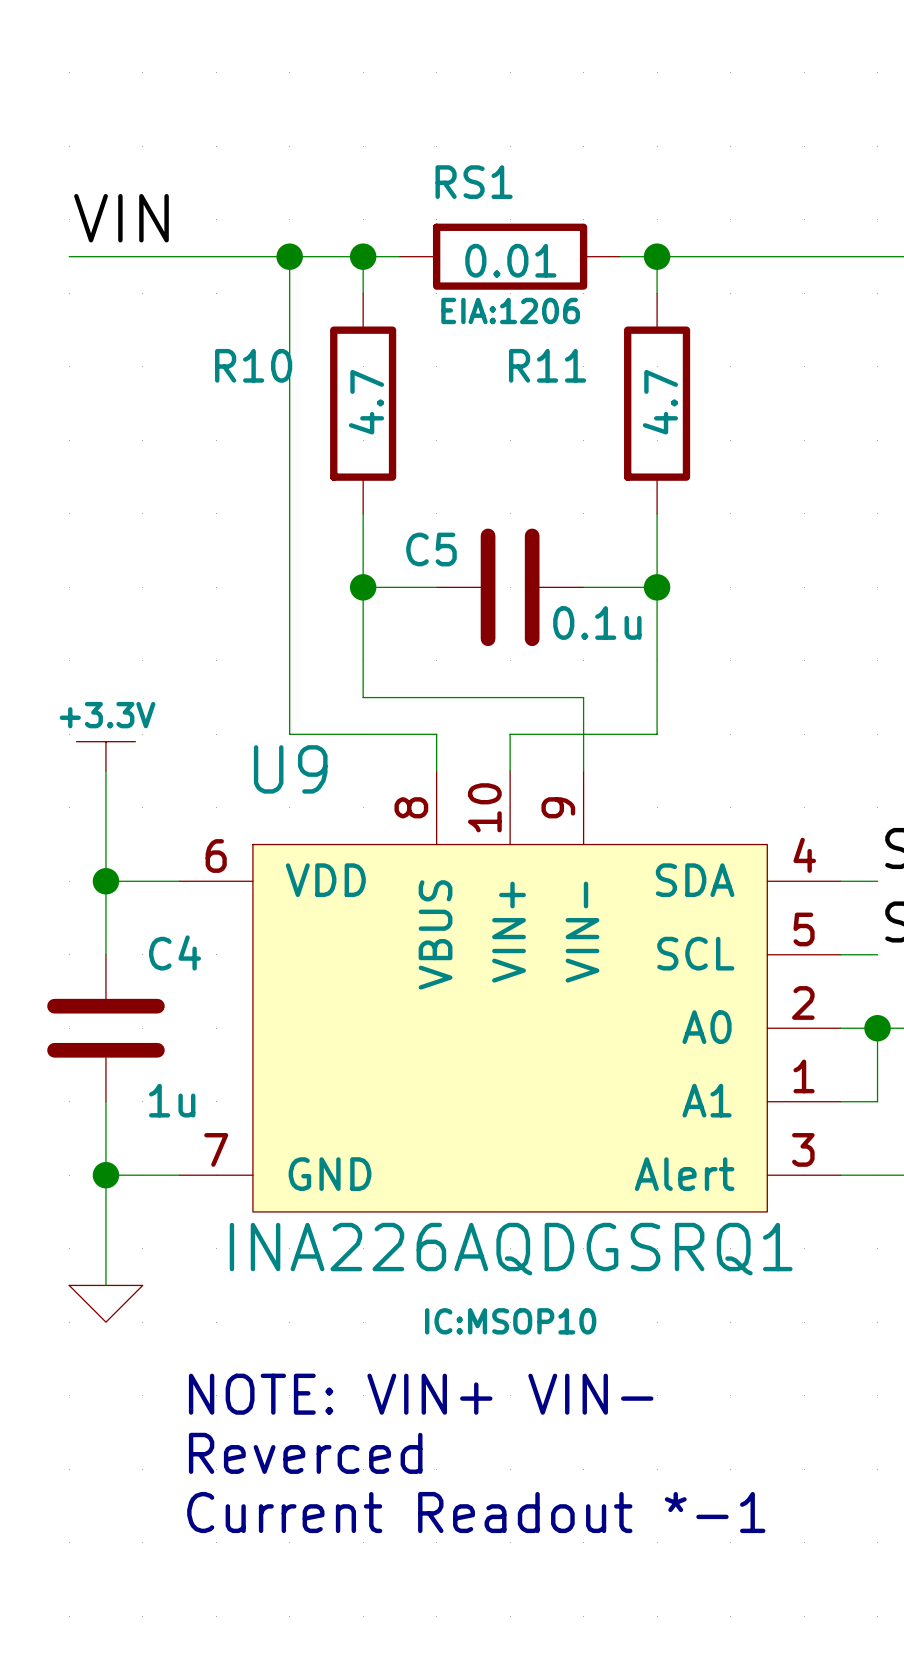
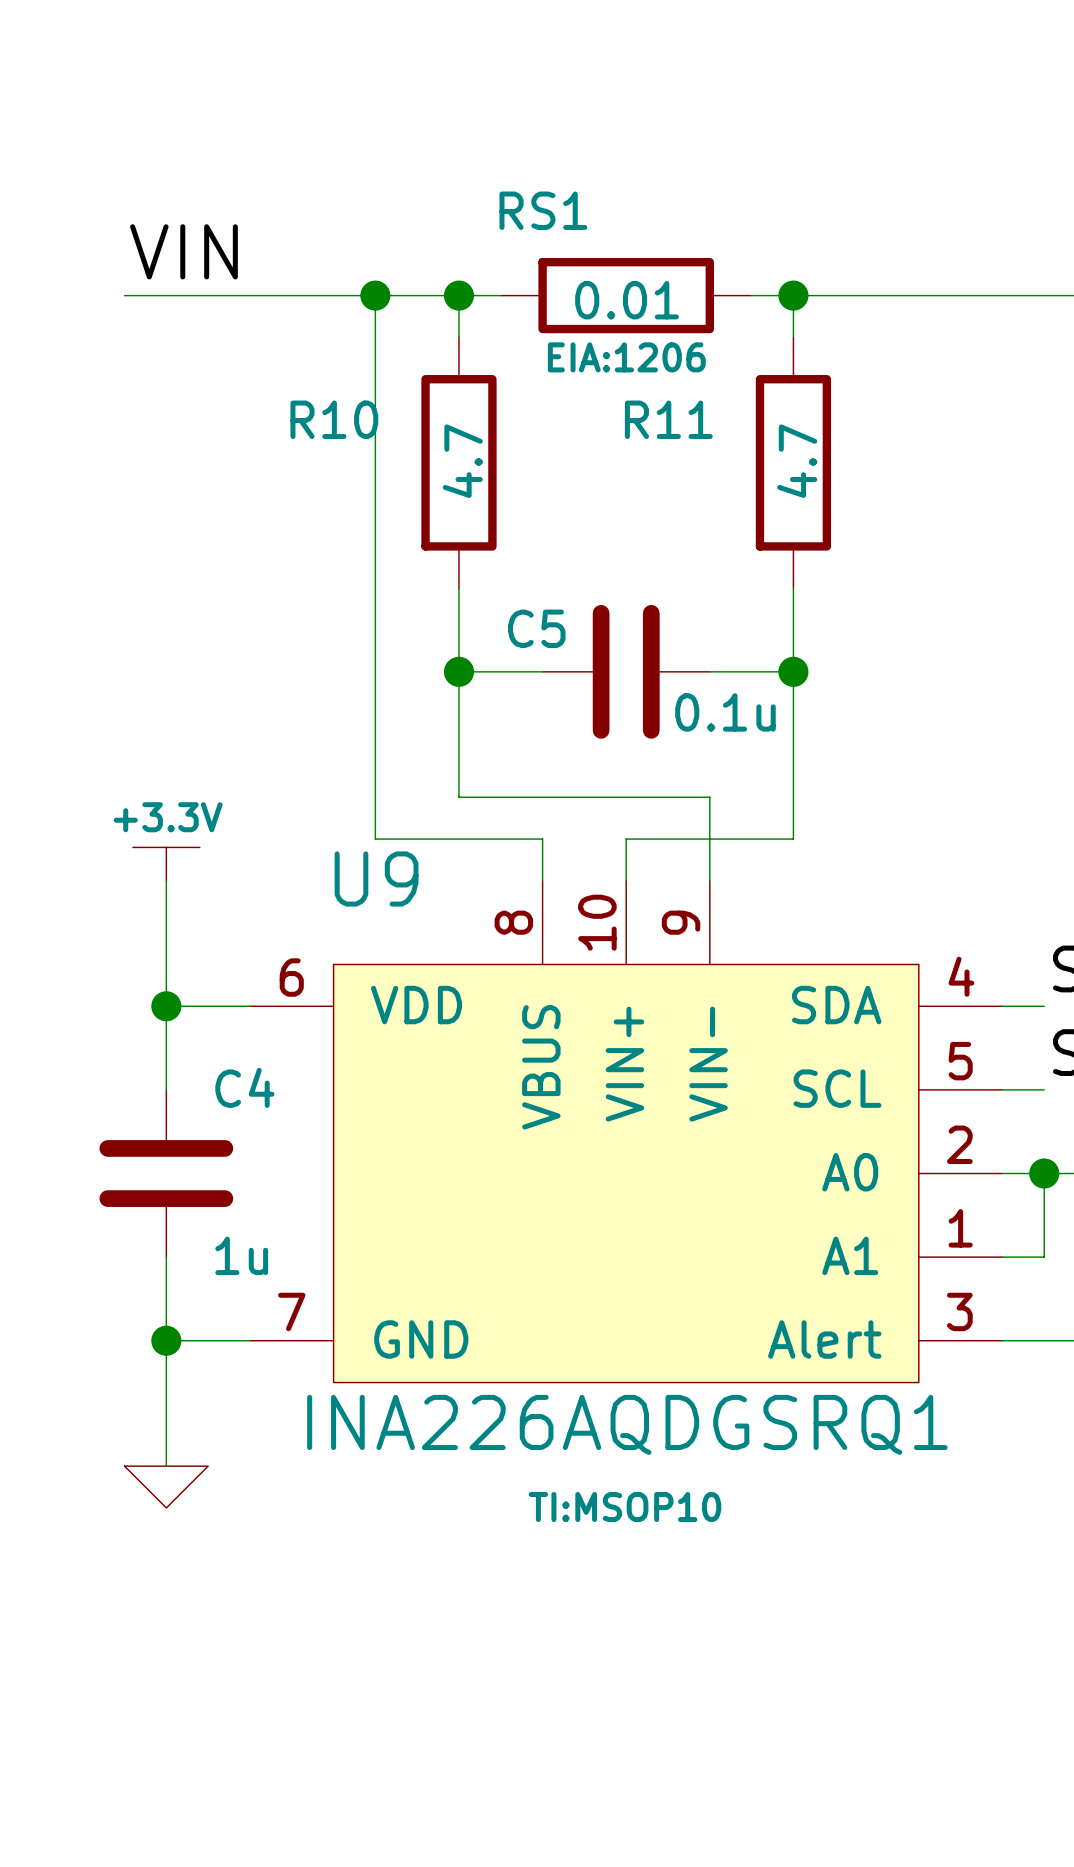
RS1 name position: RS1 (474, 182) -> RS1 (543, 210)
U9 text: IC:MSOP10 (510, 1321) -> TI:MSOP10 (625, 1507)
text: NOTE: VIN+ VIN- (421, 1394) -> none
text: Reverced (305, 1453) -> none
text: Current Readout *-1 (476, 1512) -> none

